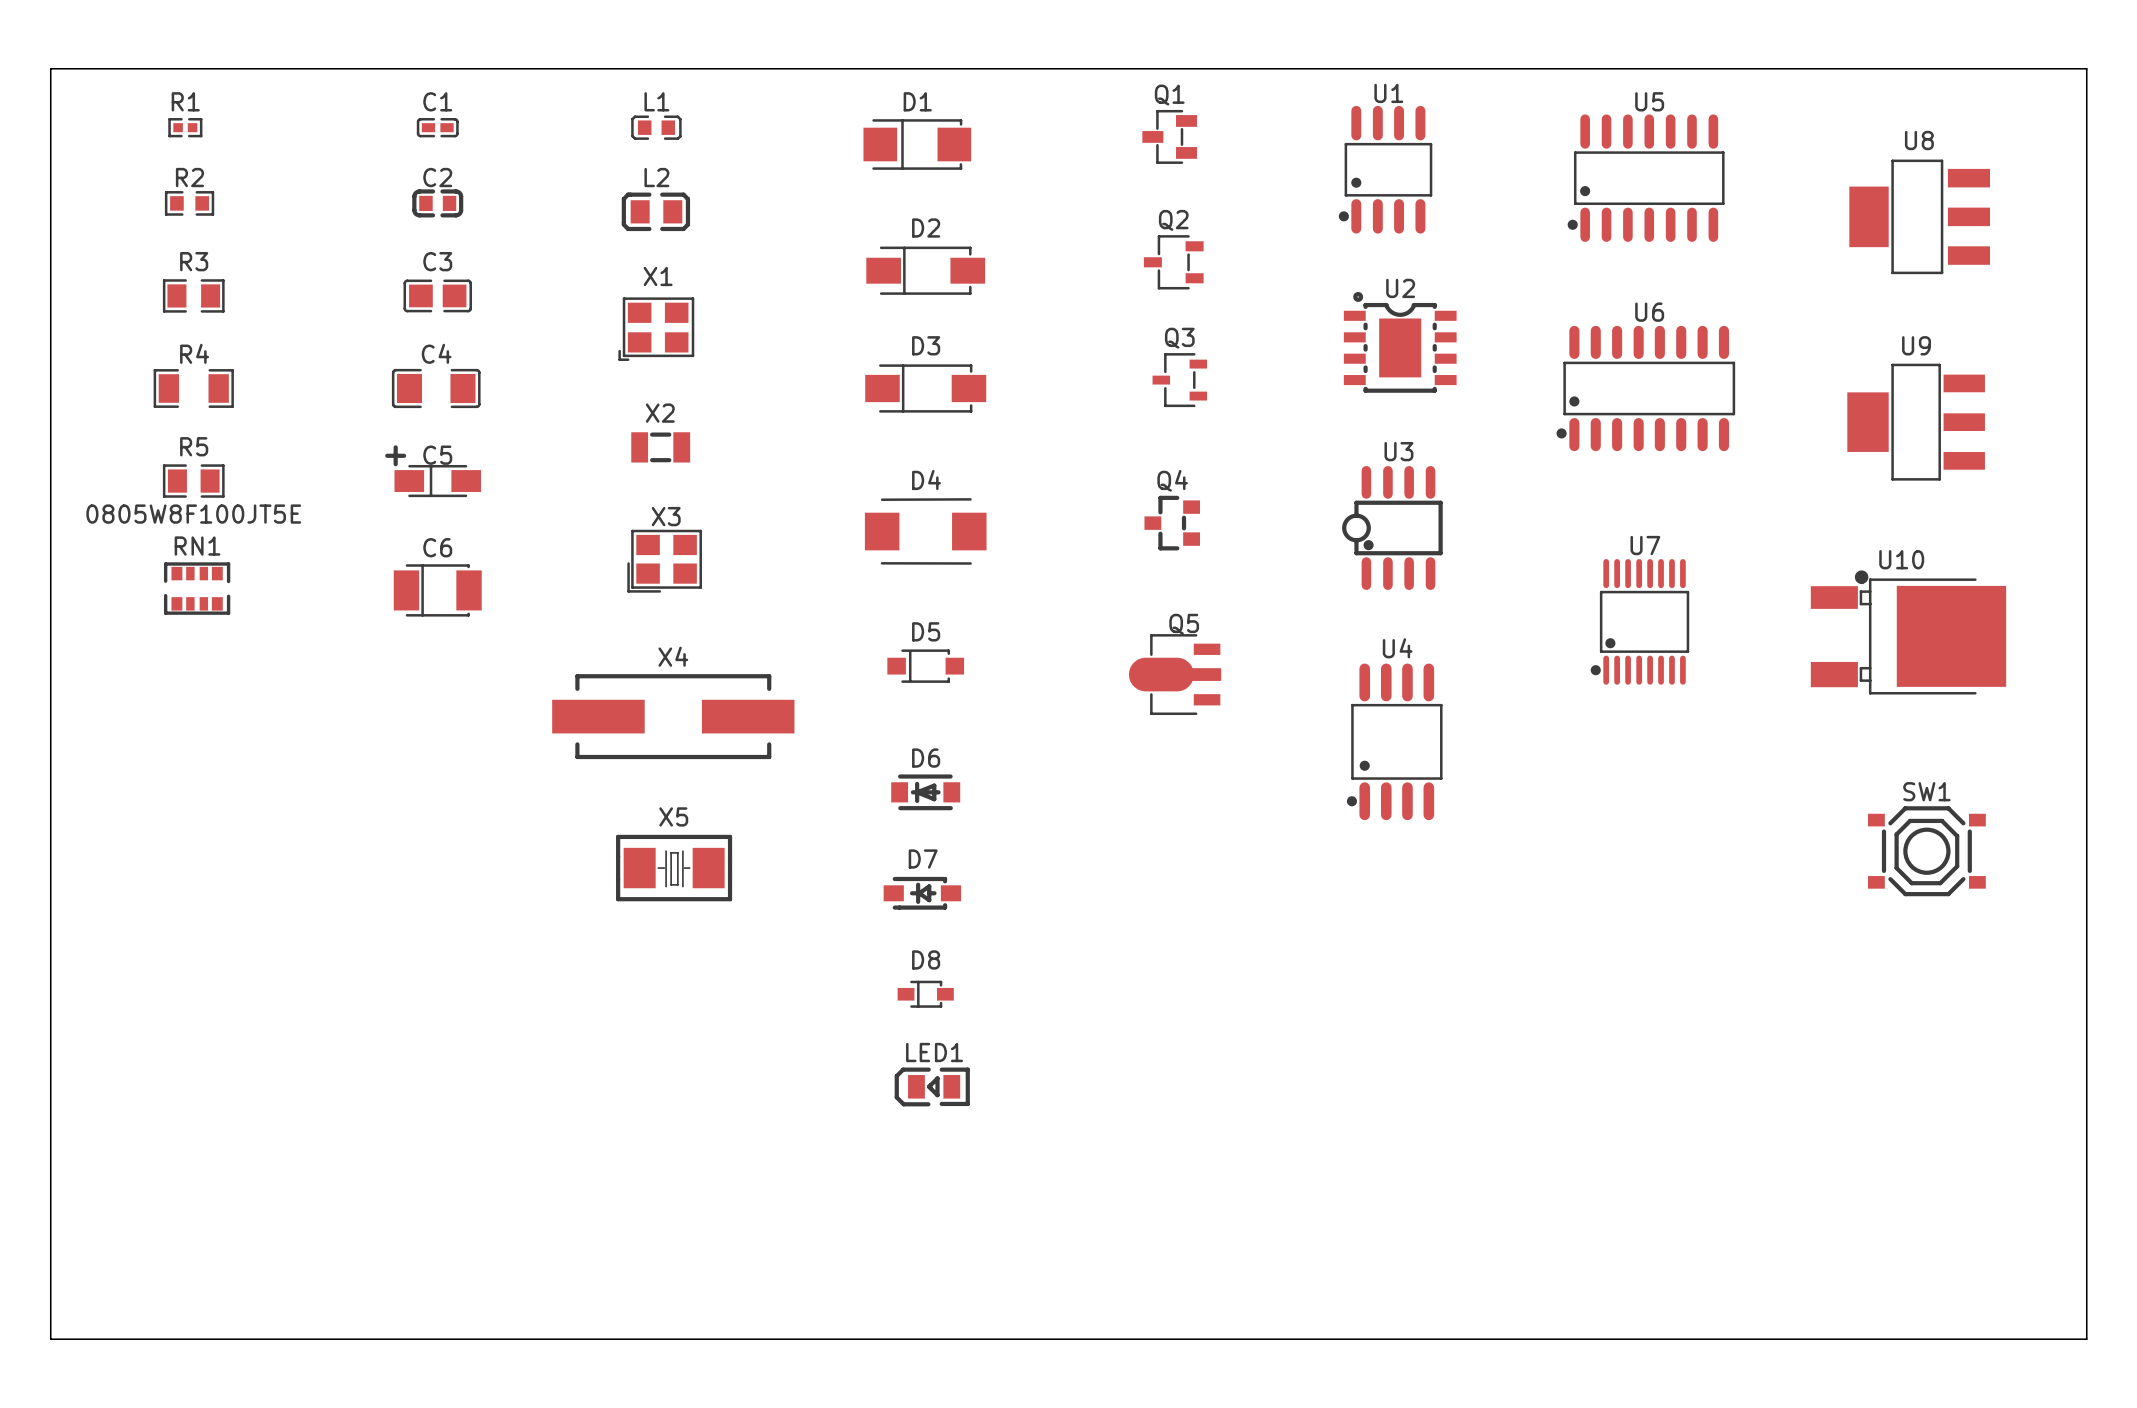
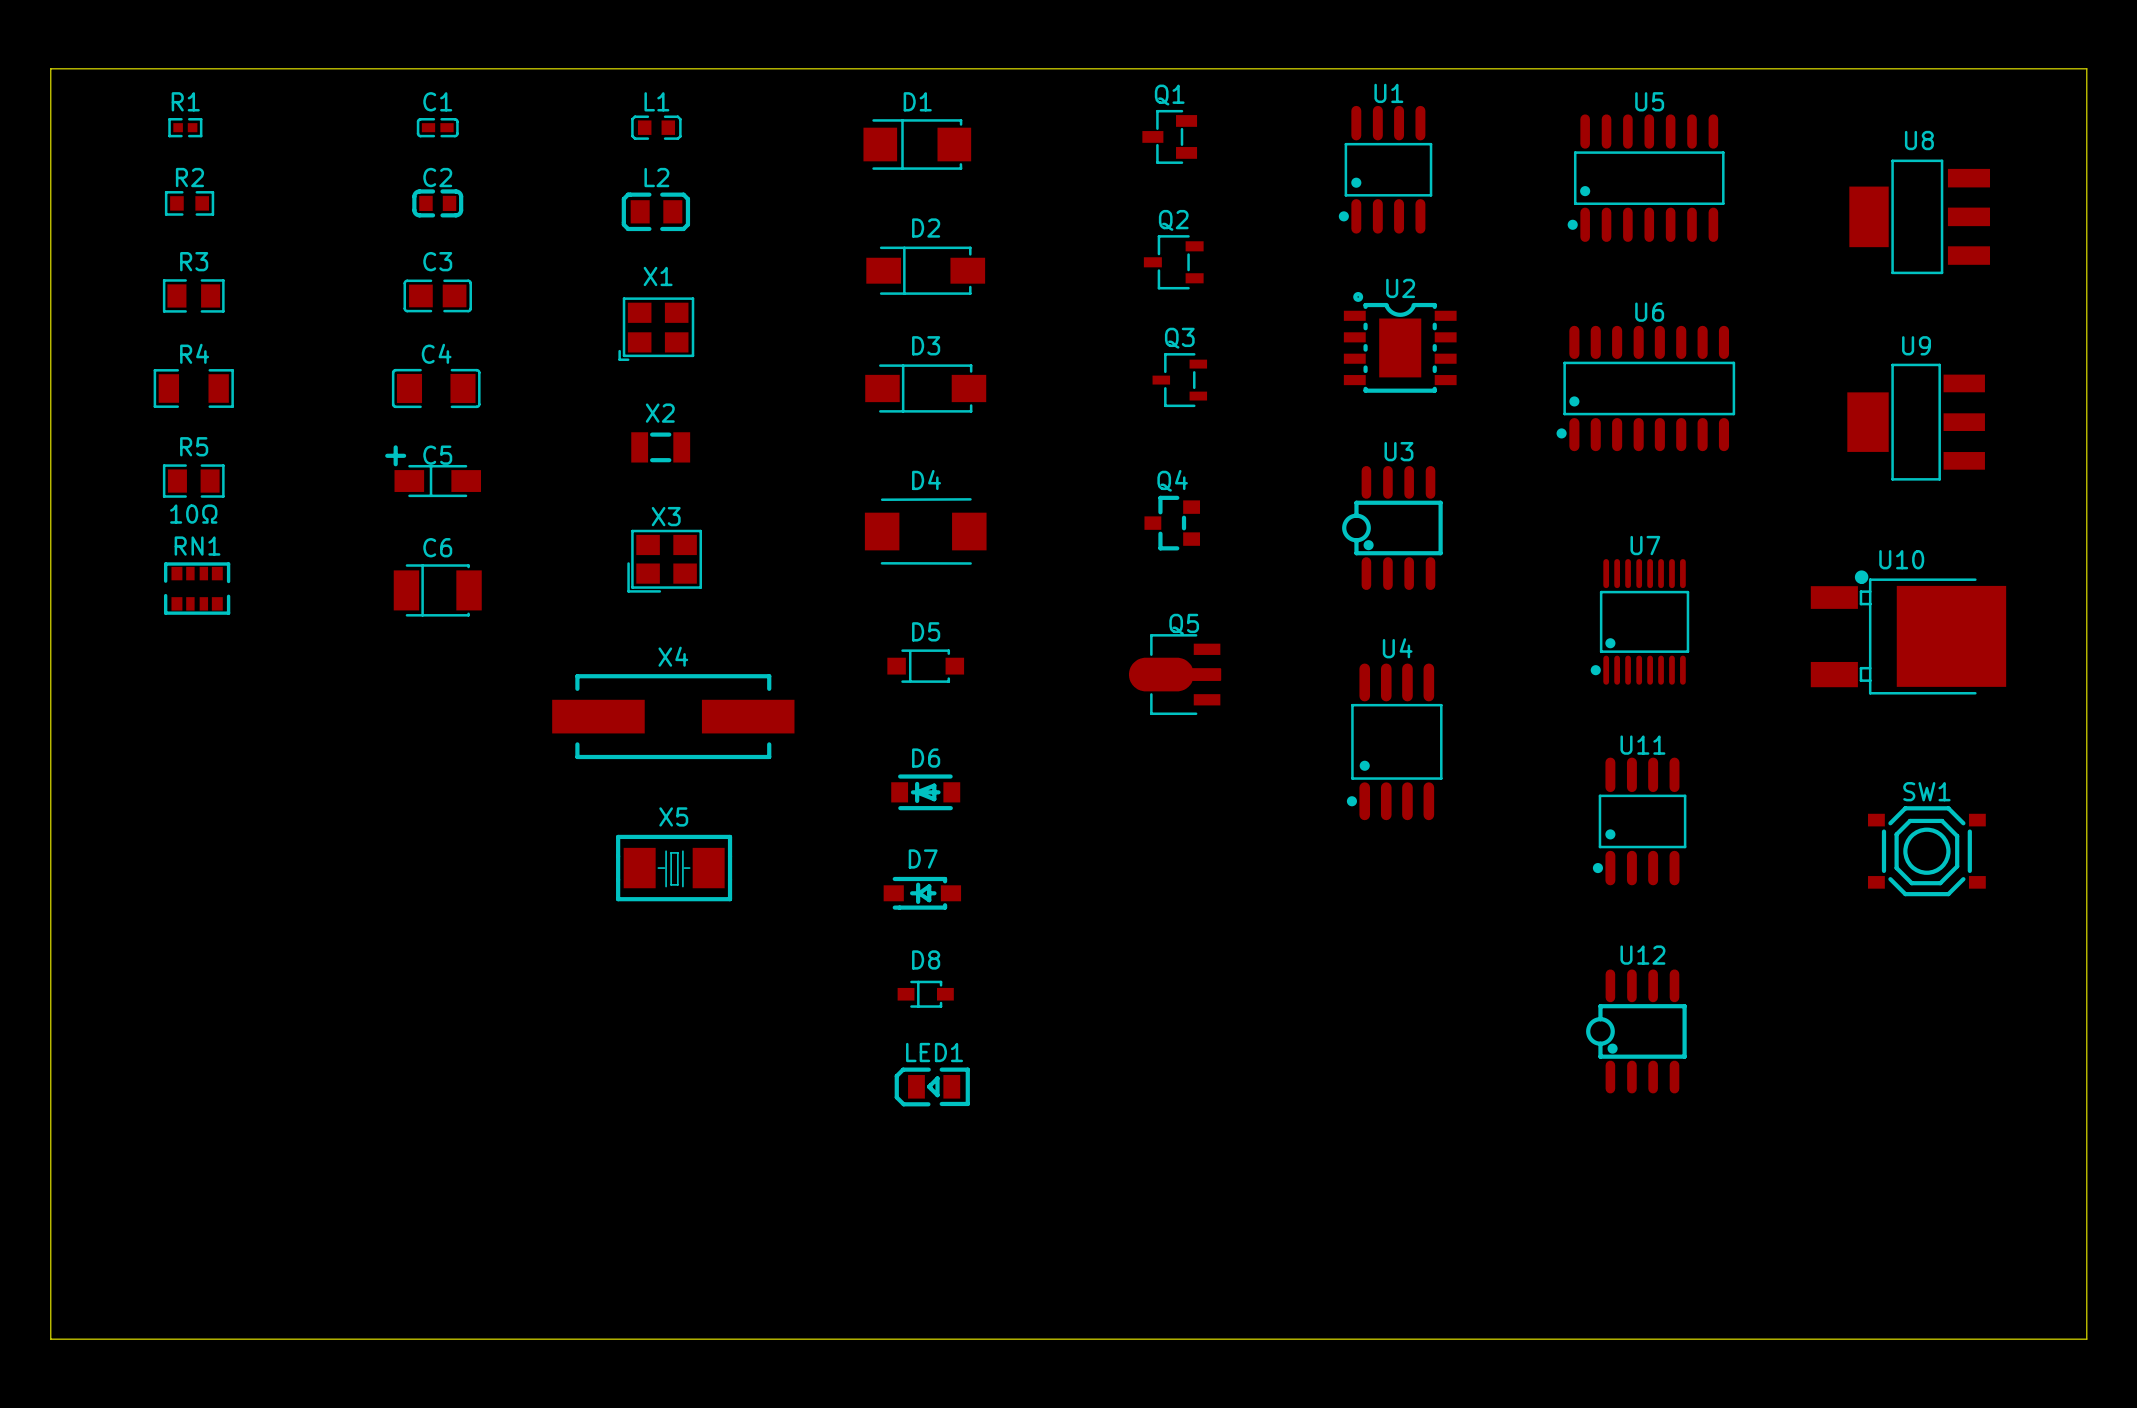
R5 value: 0805W8F100JT5E (193, 514) -> 10Ω (193, 514)
U11: none -> (1639, 821)
U12: none -> (1636, 1031)

